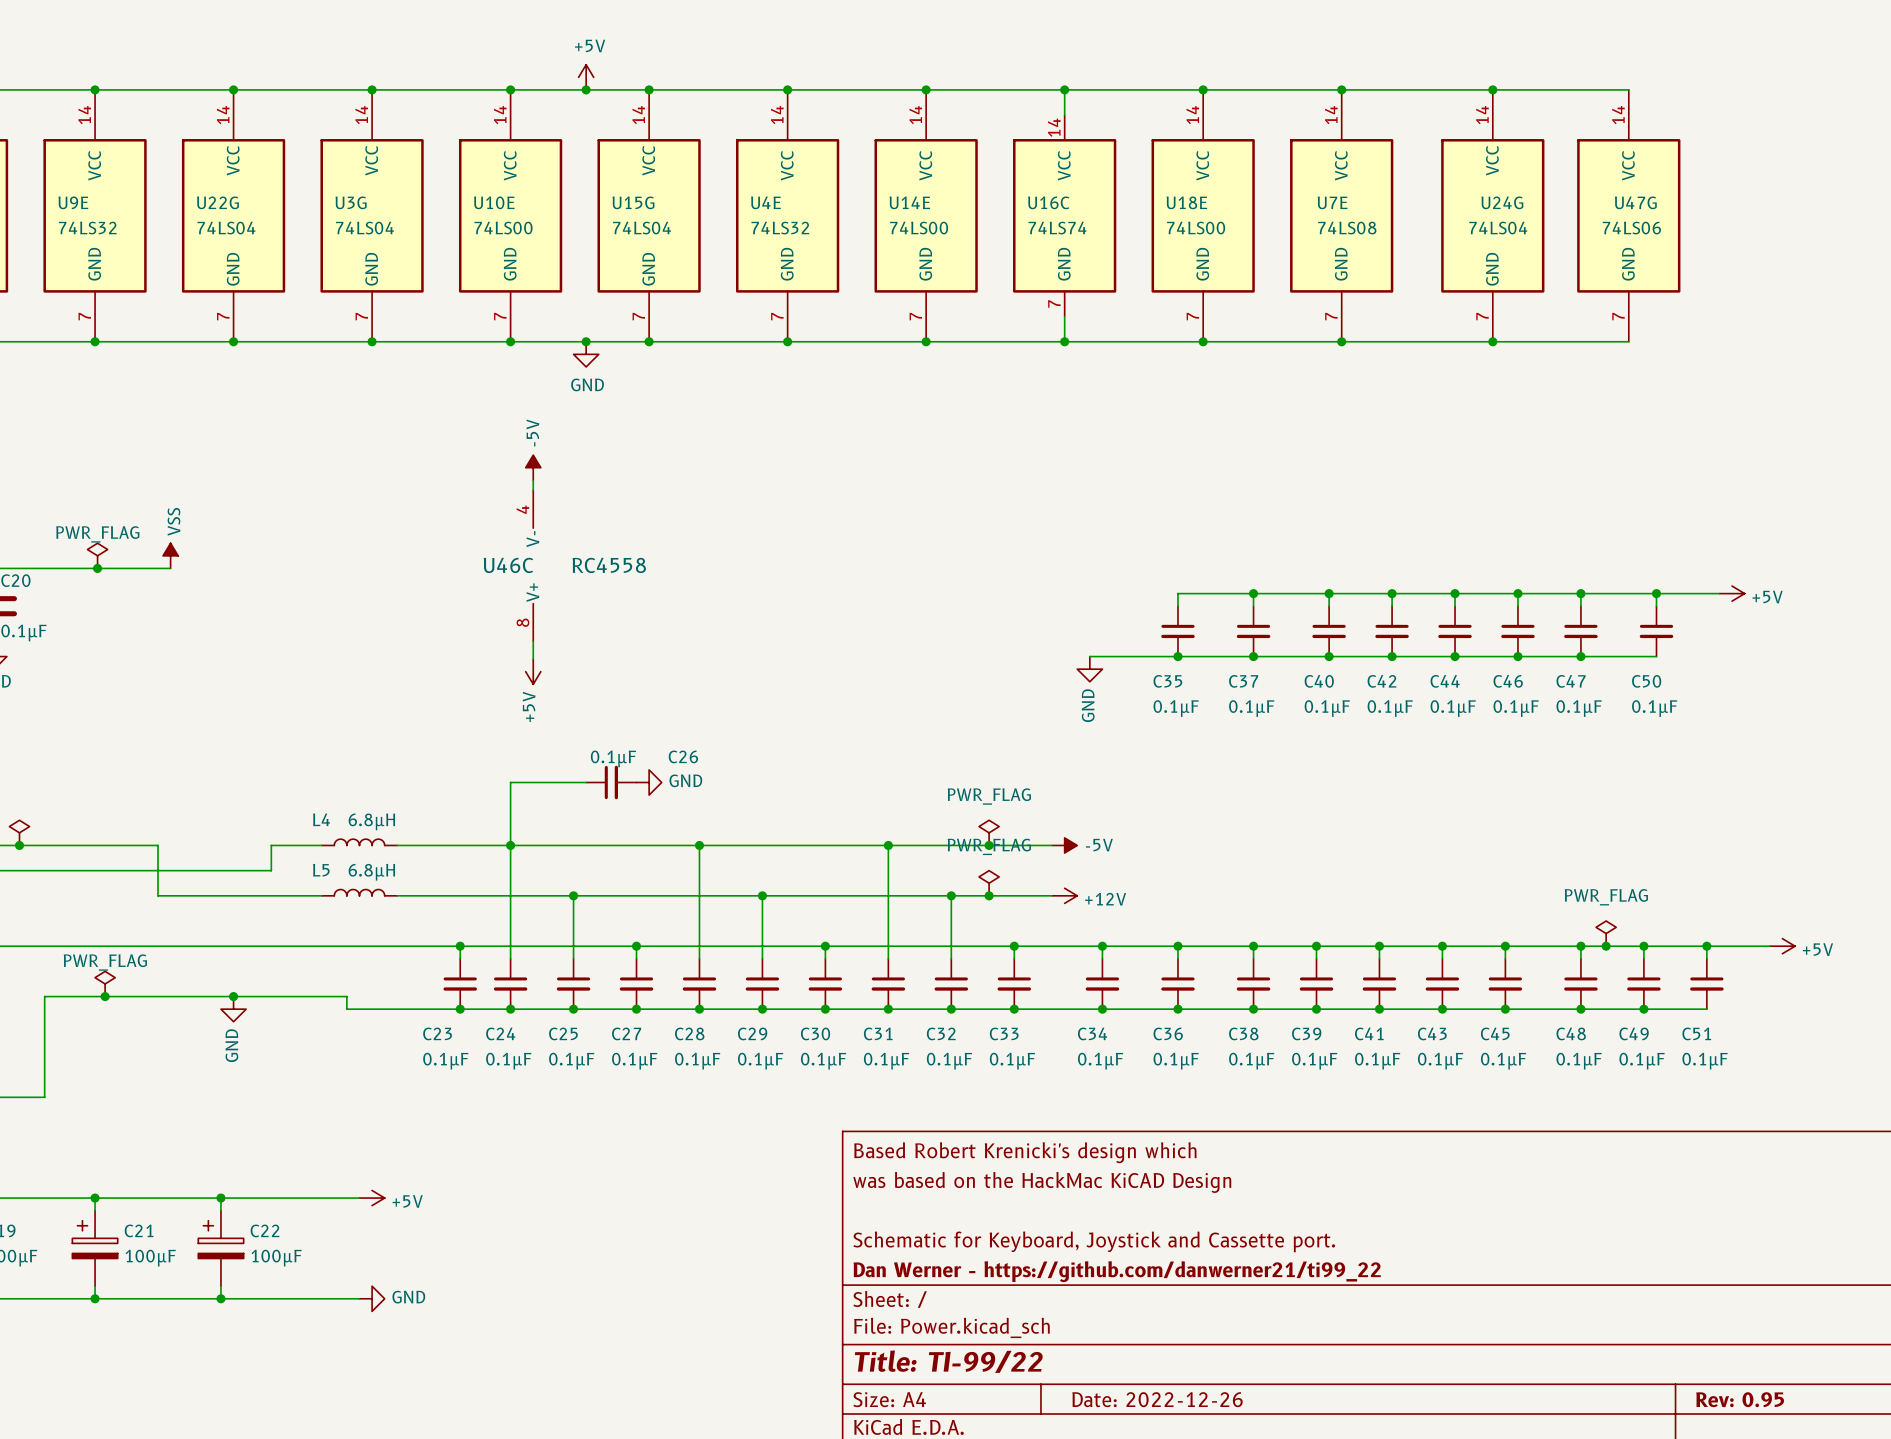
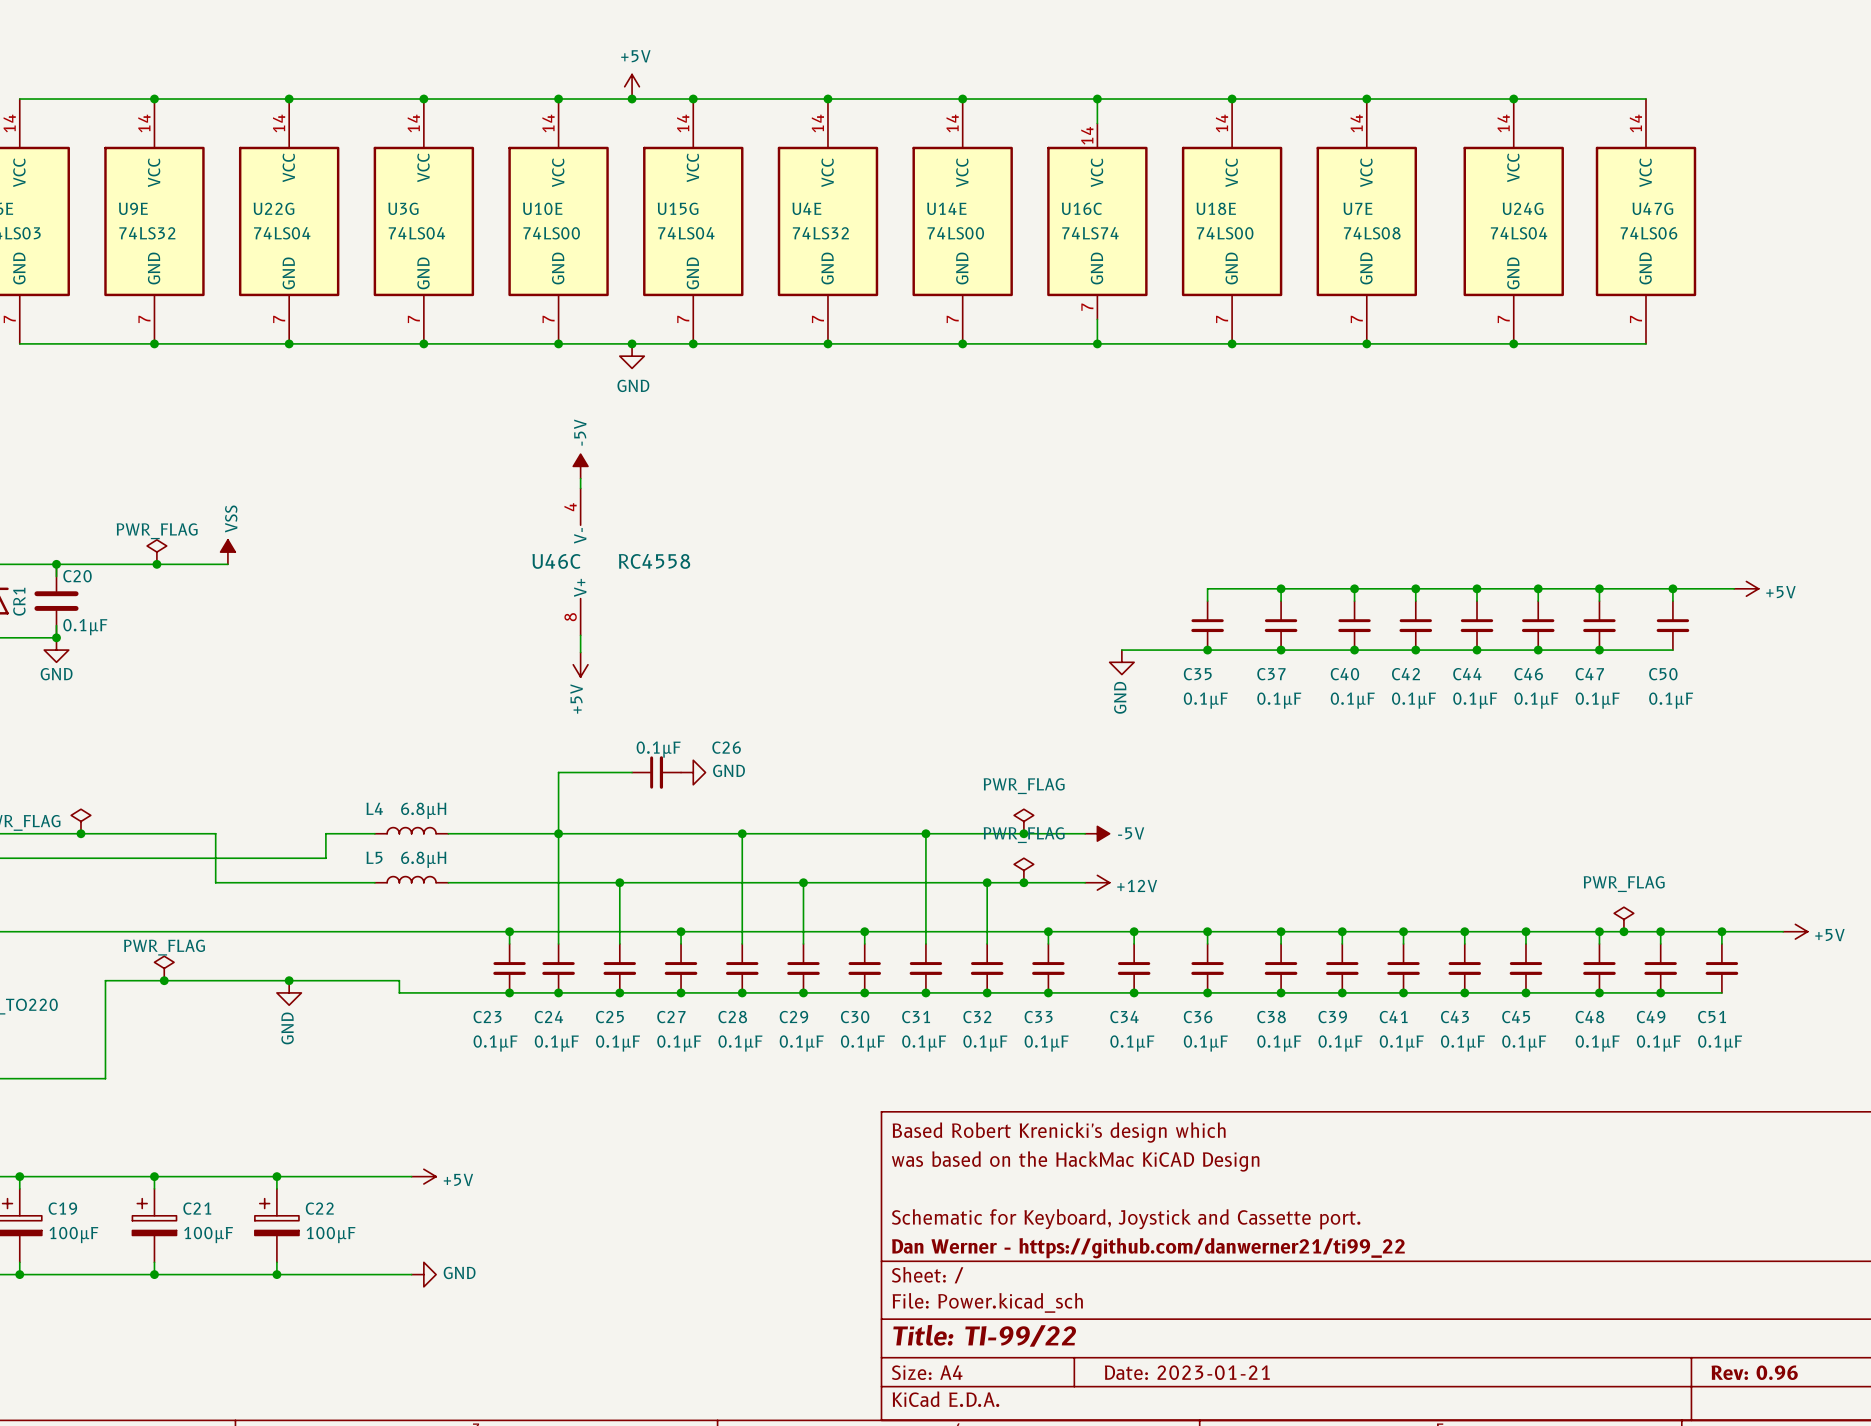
title block: Date: 2022-12-26 (1157, 1399) -> Date: 2023-01-21 (1187, 1372)
title block: Rev: 0.95 (1740, 1399) -> Rev: 0.96 (1754, 1372)

